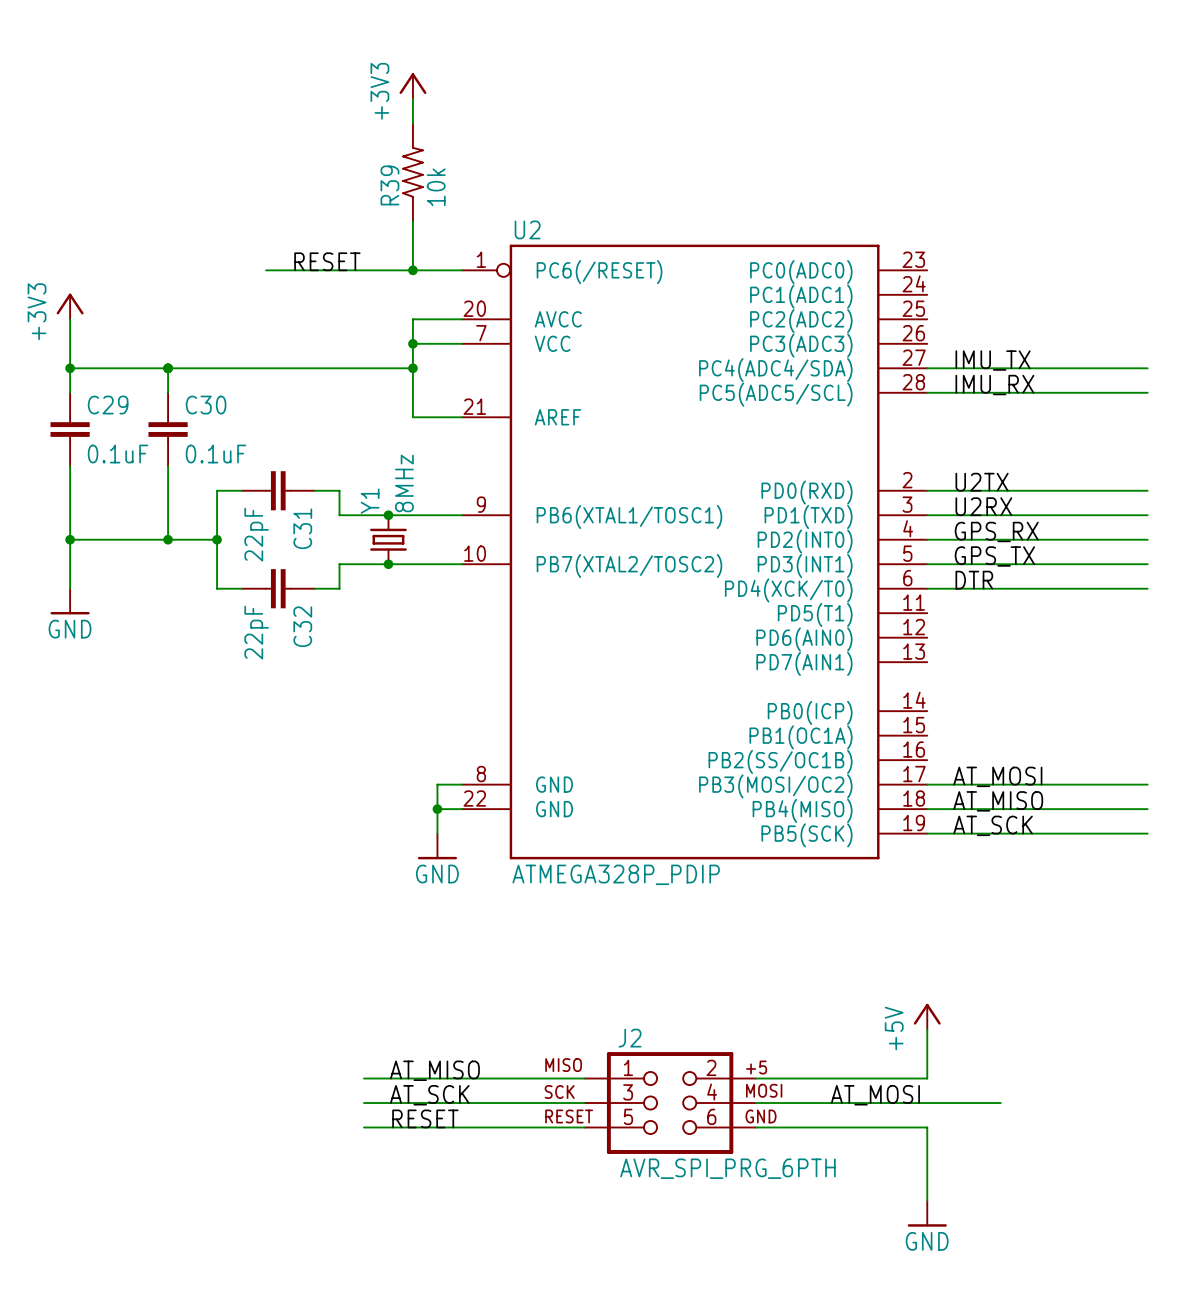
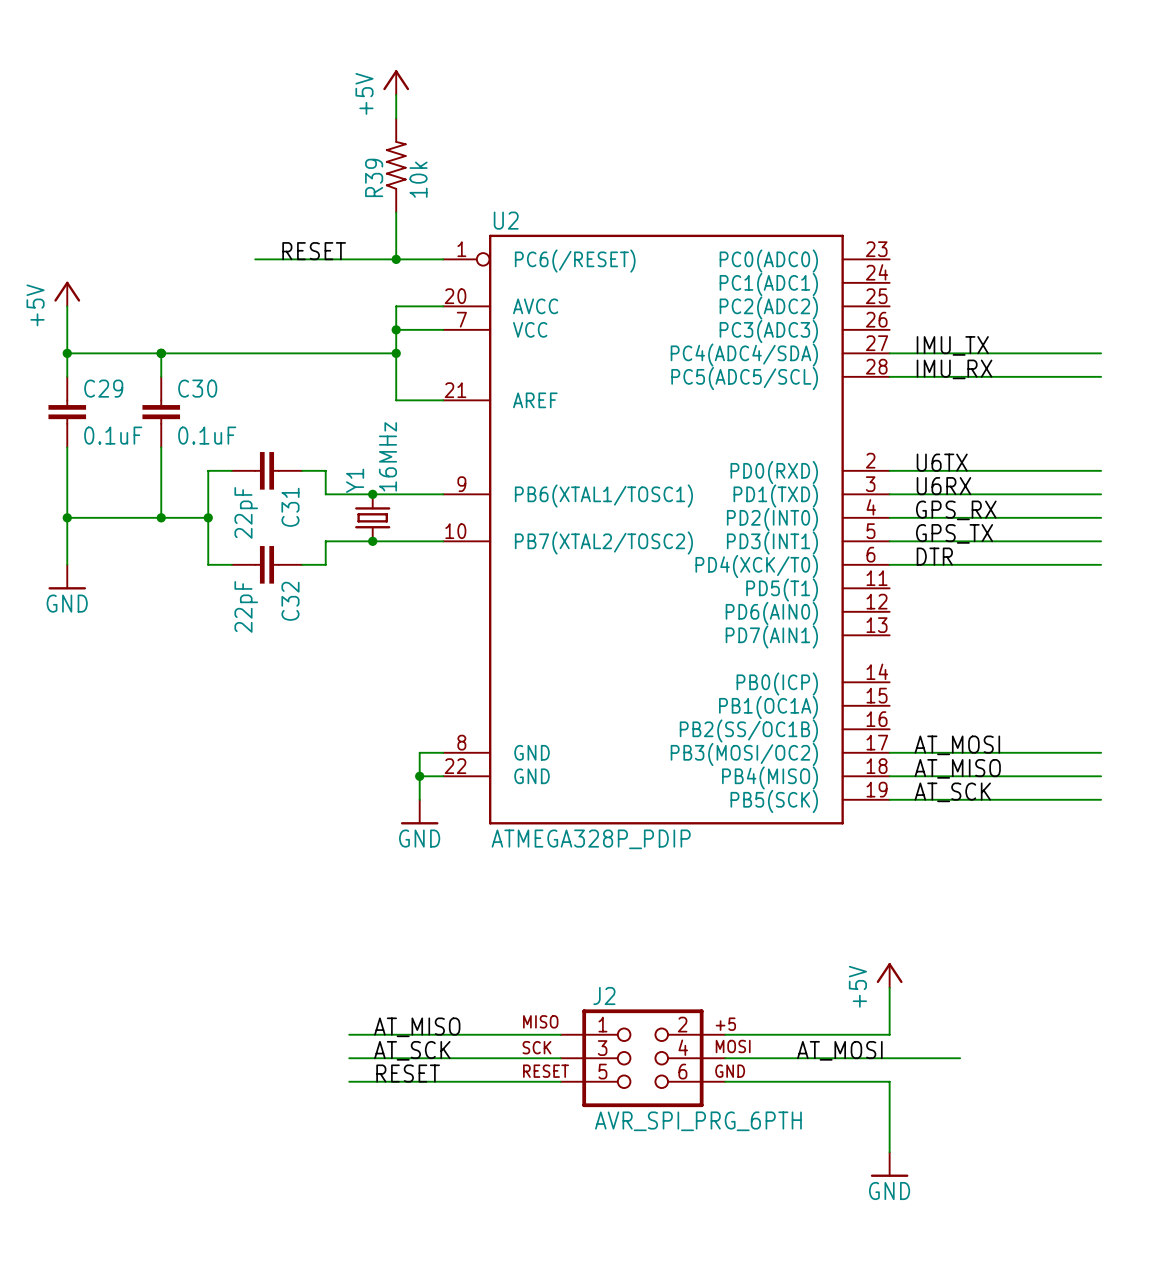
power symbol: +3V3 (412, 86) -> +5V (396, 82)
power symbol: +3V3 (70, 306) -> +5V (67, 294)
label: U2TX (982, 482) -> U6TX (942, 462)
Y1 value: 8MHz (404, 483) -> 16MHz (387, 456)
label: U2RX (983, 506) -> U6RX (943, 486)

